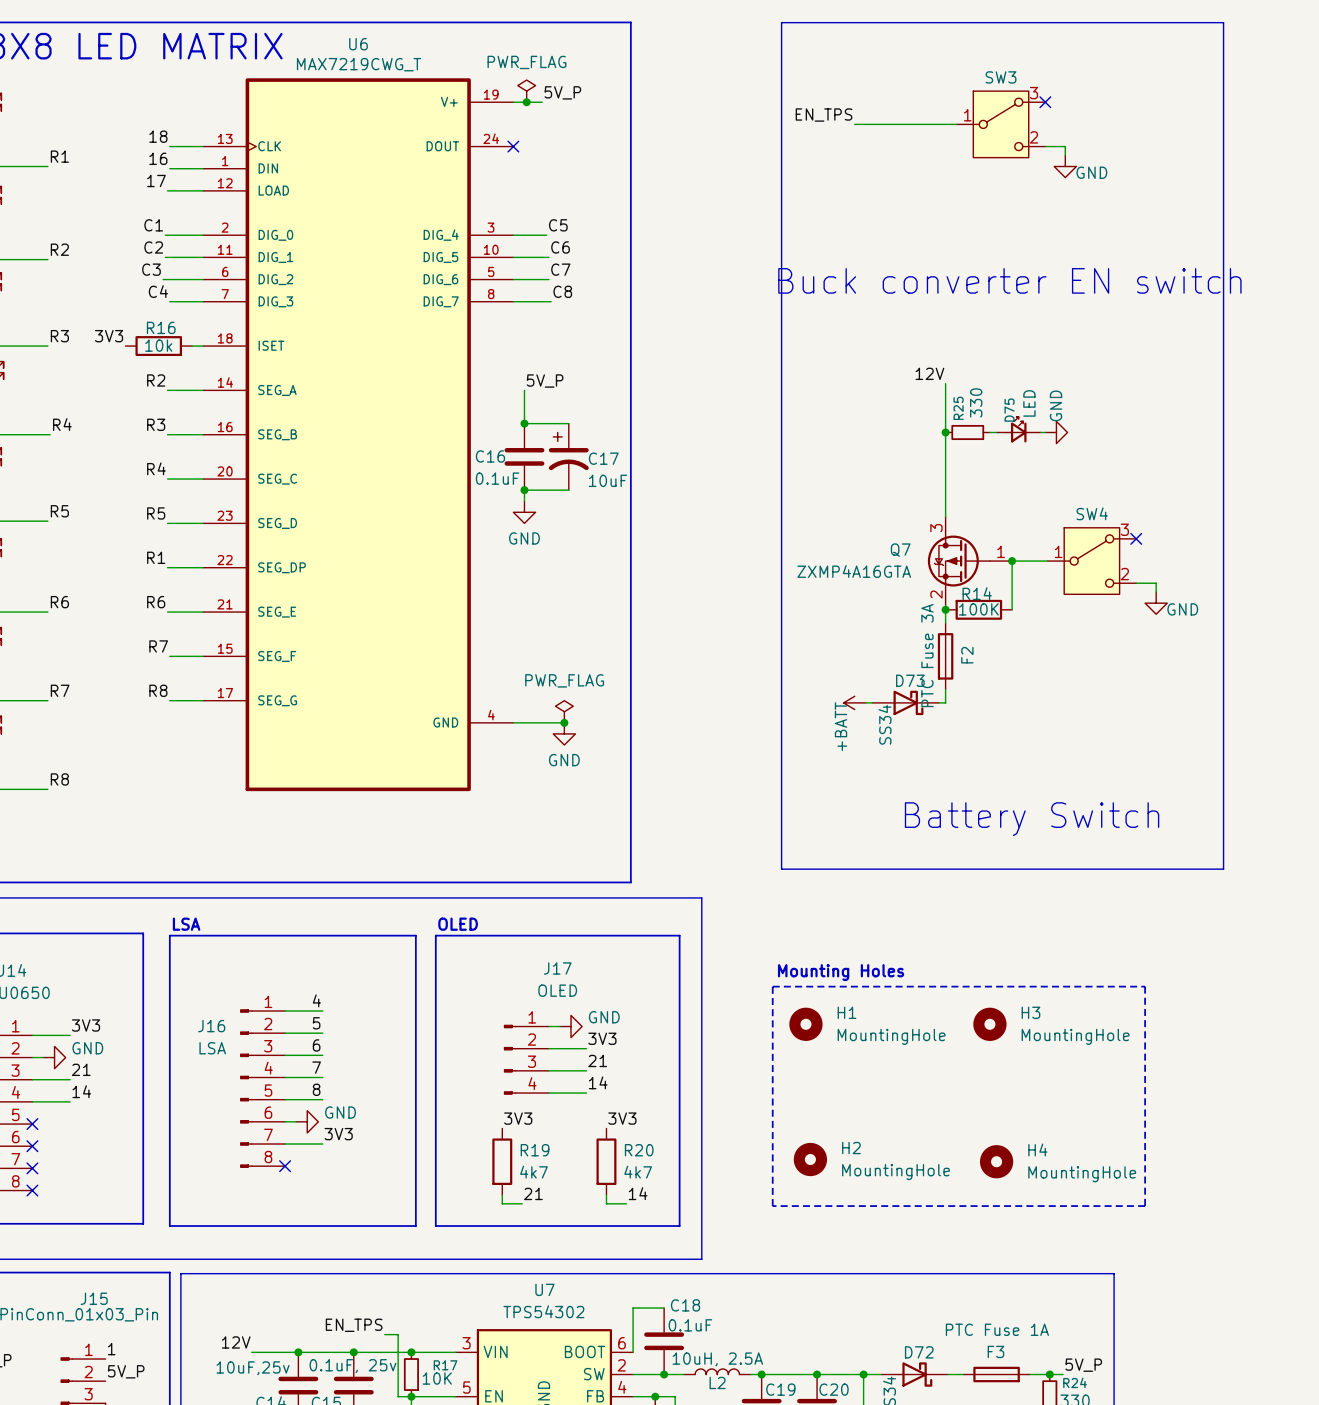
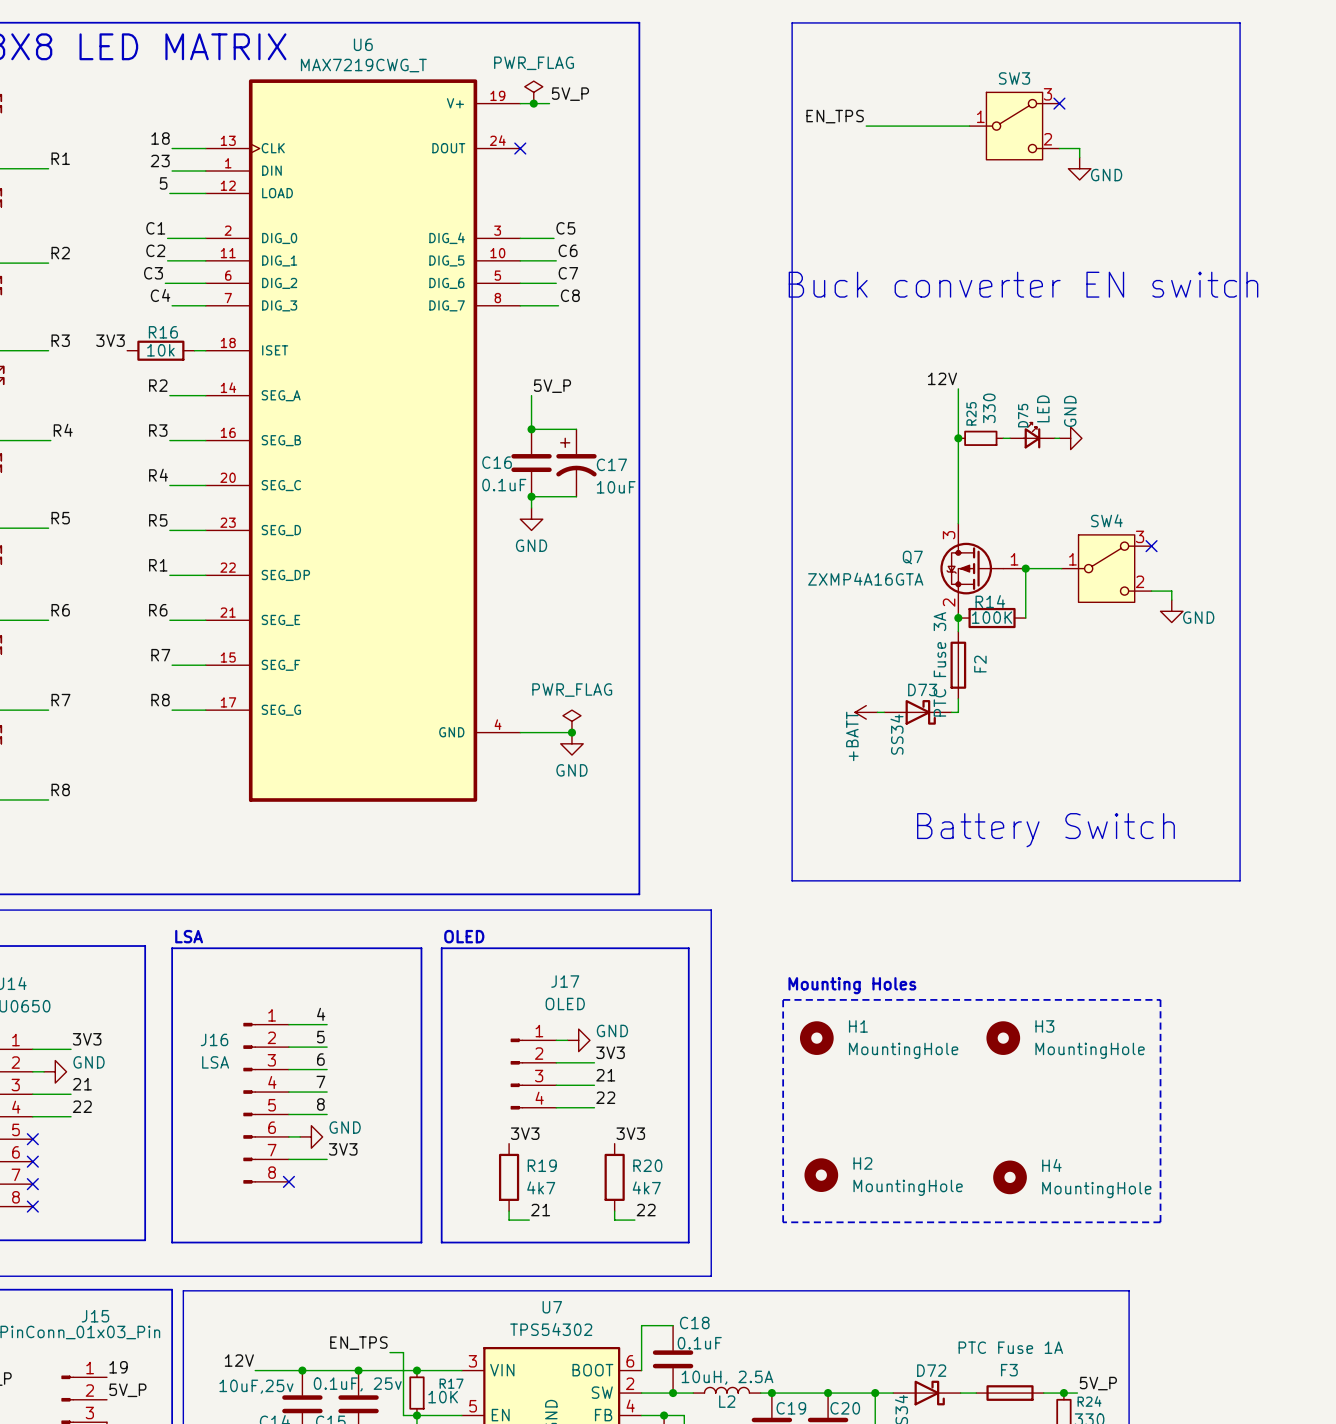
label: 16 (158, 158) -> 23 (160, 160)
label: 17 (156, 181) -> 5 (163, 183)
label: 14 (598, 1082) -> 22 (605, 1097)
label: 14 (81, 1091) -> 22 (82, 1106)
label: 14 (638, 1193) -> 22 (646, 1210)
label: 1 (111, 1349) -> 19 (118, 1367)

